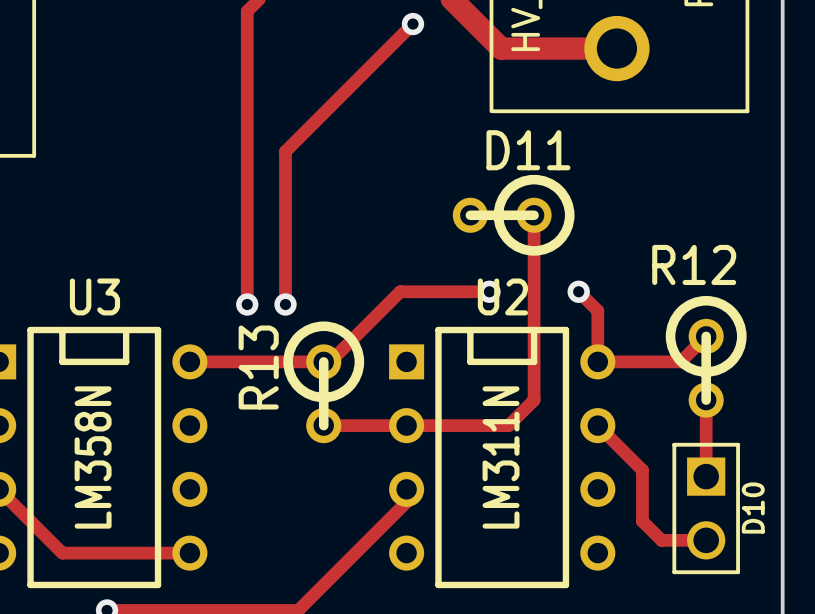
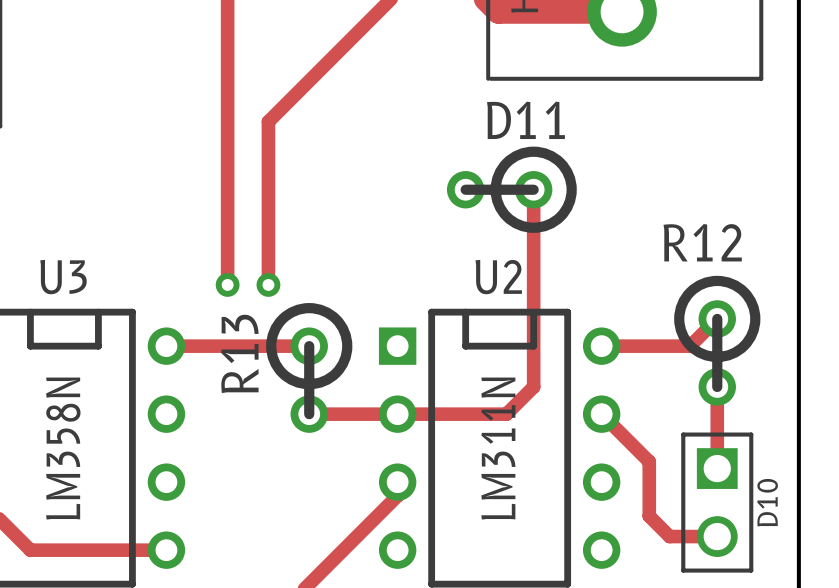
track: (489, 291) (400, 291) (330, 361) (323, 361) -> none
via: (489, 291) -> none
track: (578, 291) (597, 310) (597, 361) -> none
via: (578, 291) -> none

